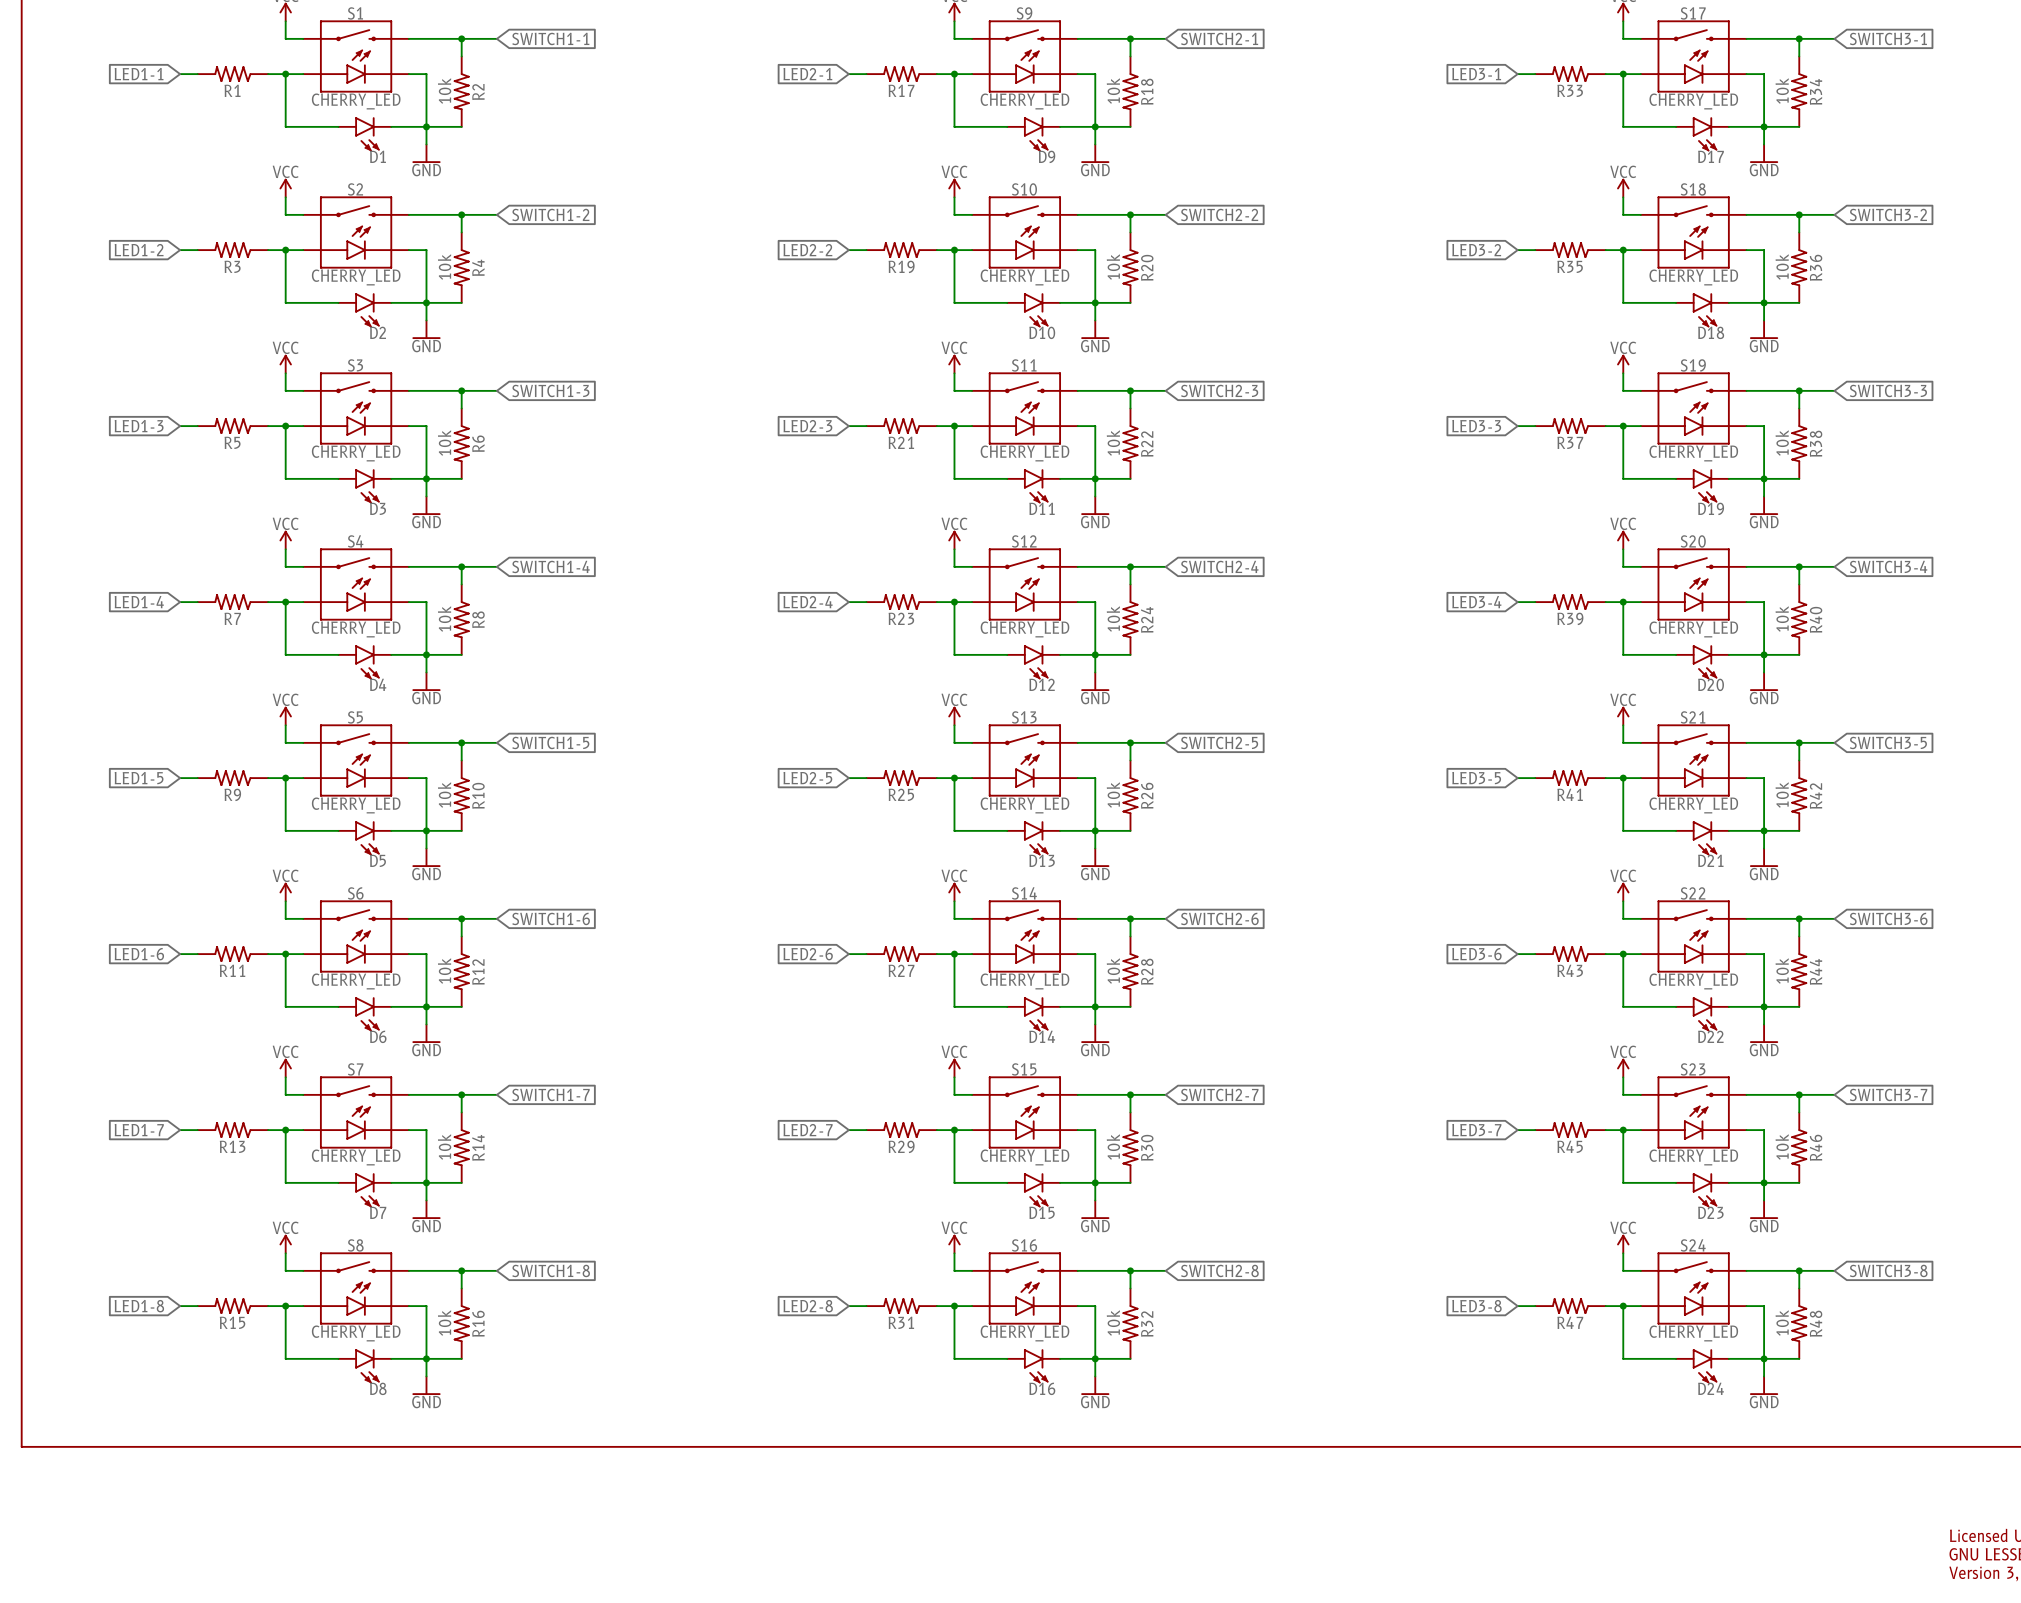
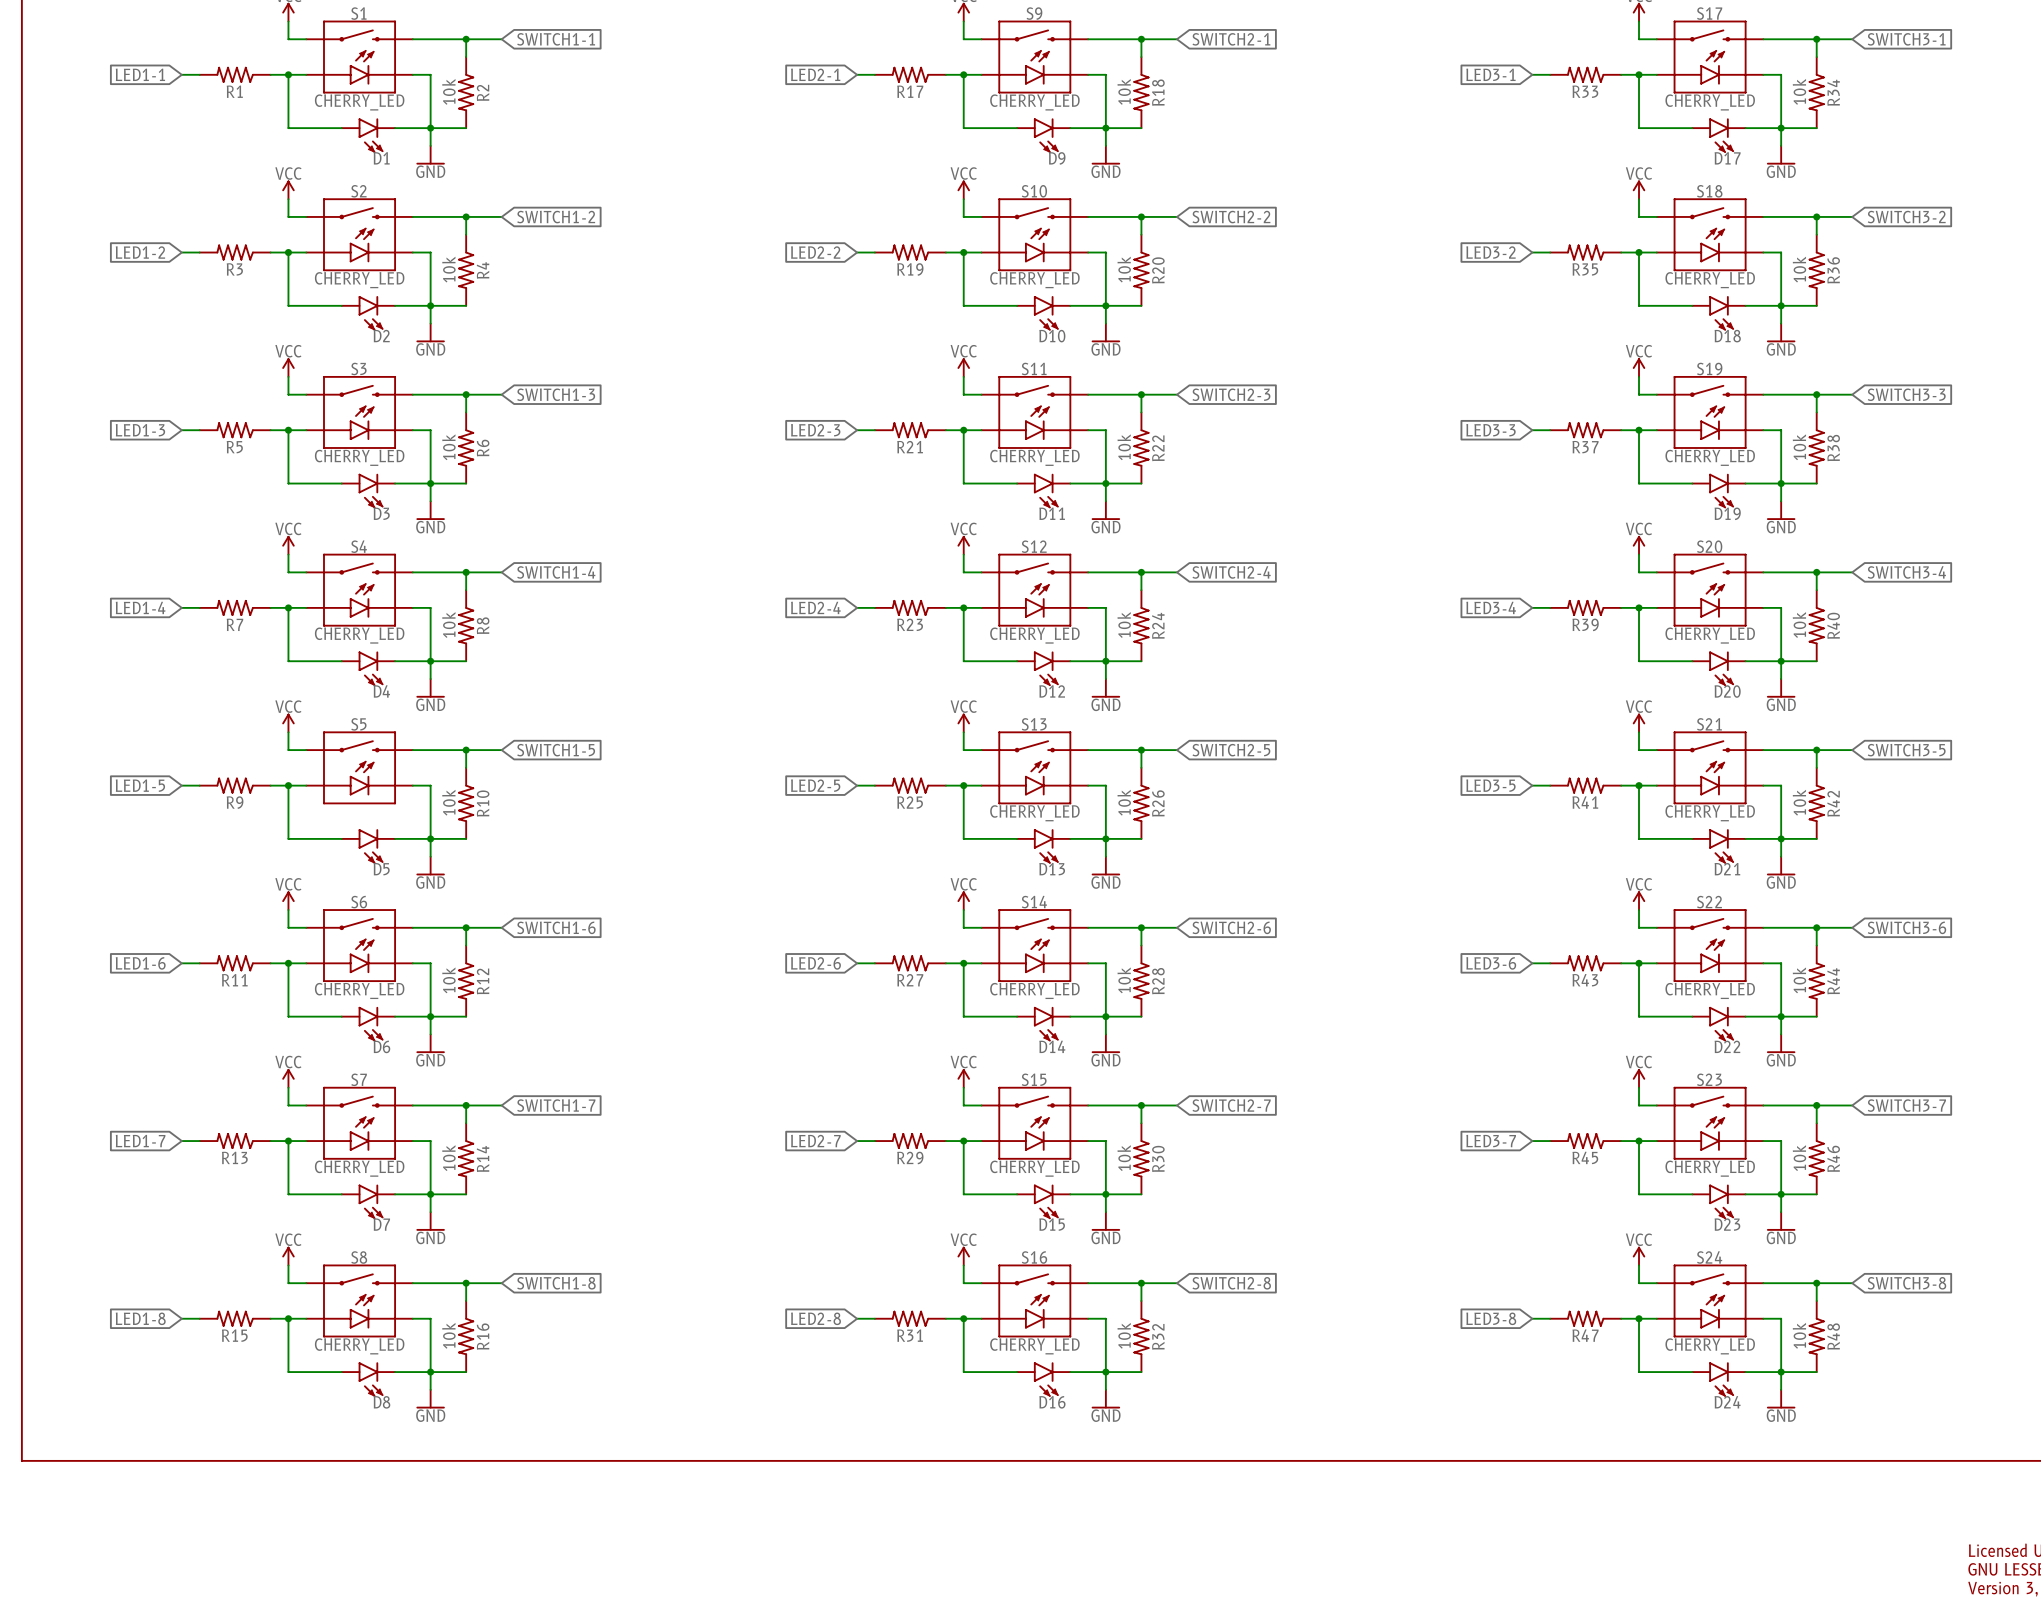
S5 value: CHERRY_LED (356, 805) -> none

